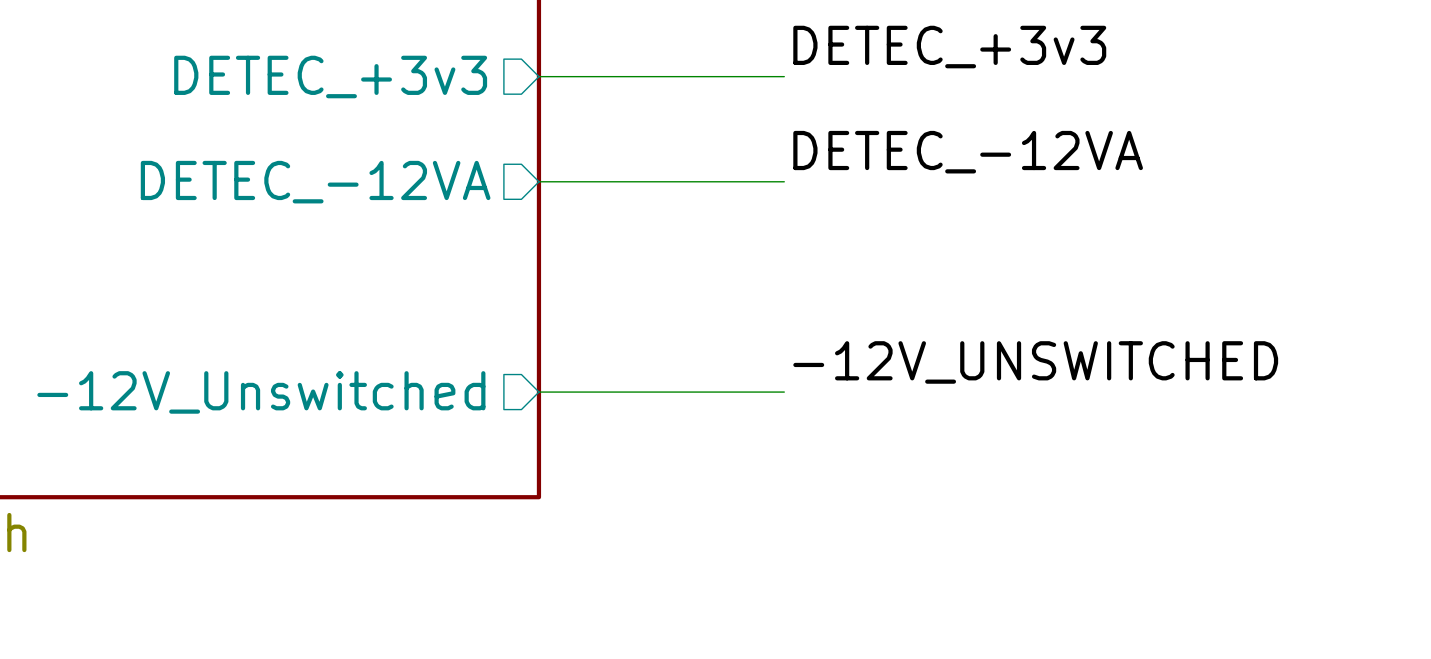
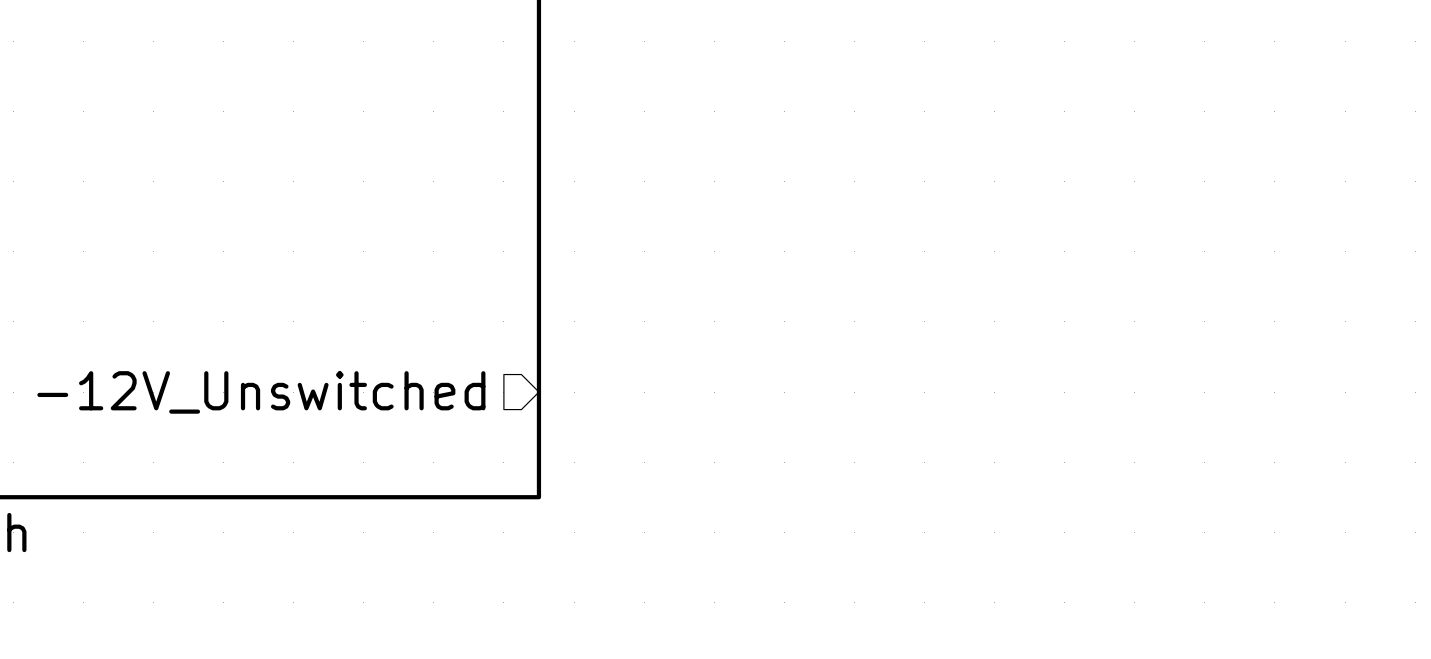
label: DETEC_+3v3 (949, 47) -> none
wire: (538, 76) (784, 76) -> none
sheet pin: DETEC_+3v3 (330, 77) -> none
label: DETEC_-12VA (968, 152) -> none
wire: (538, 181) (784, 181) -> none
sheet pin: DETEC_-12VA (315, 182) -> none
label: -12V_UNSWITCHED (1035, 362) -> none
wire: (538, 392) (784, 392) -> none

